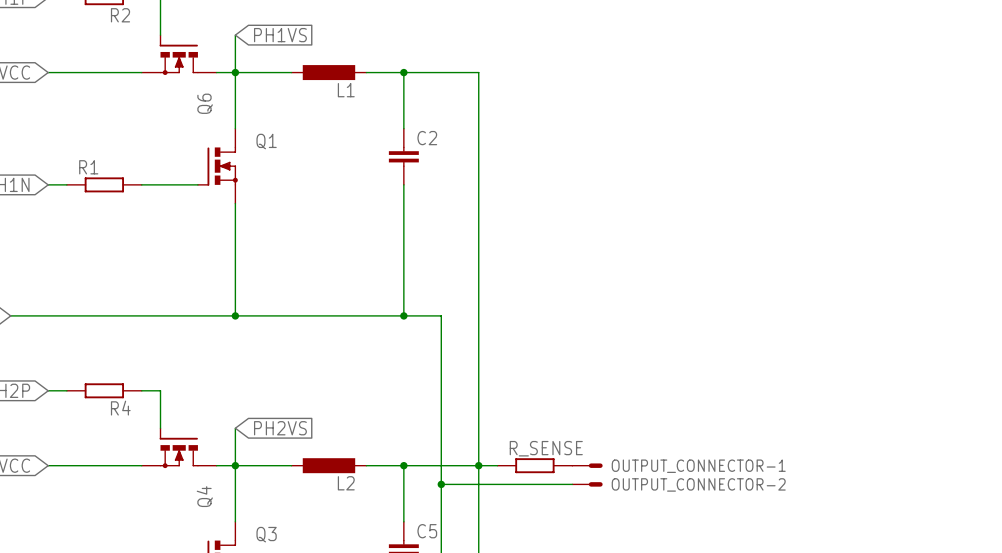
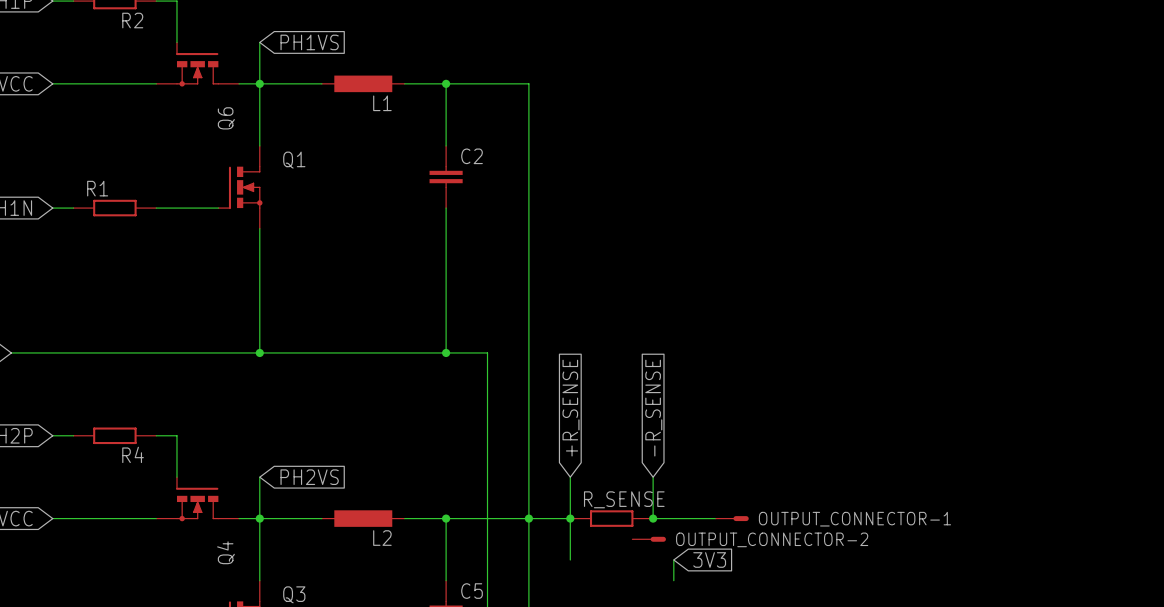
global label: none -> +R_SENSE (571, 408)
global label: none -> -R_SENSE (653, 408)
wire: none -> (570, 477) (570, 559)
wire: none -> (653, 477) (653, 518) (715, 518)
junction: none -> (570, 518)
R_SENSE position: (534, 465) -> (611, 518)
OUTPUT_CONNECTOR-1 position: (587, 465) -> (731, 518)
junction: none -> (653, 518)
wire: (441, 484) (572, 484) -> none
junction: (441, 484) -> none
wire: none -> (673, 559) (673, 580)
global label: none -> 3V3 (709, 559)

